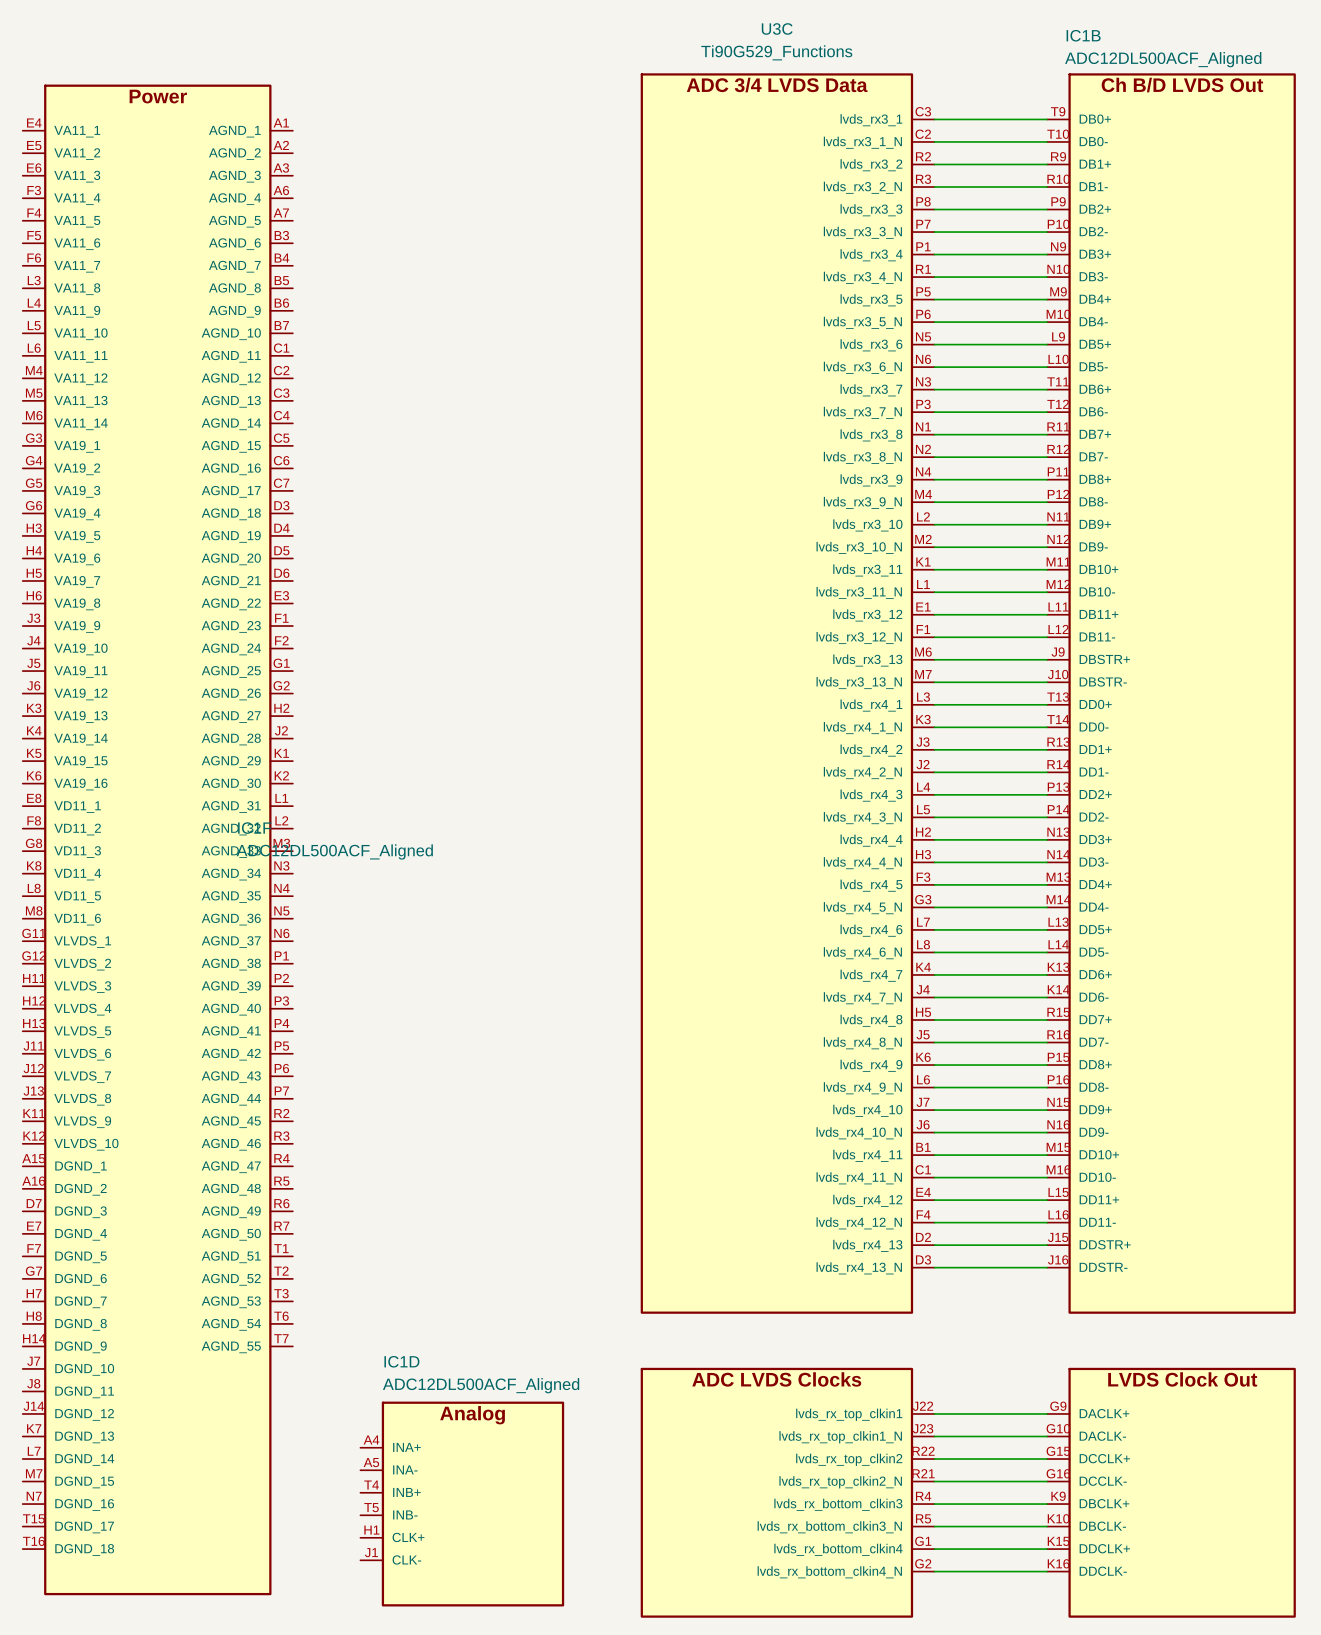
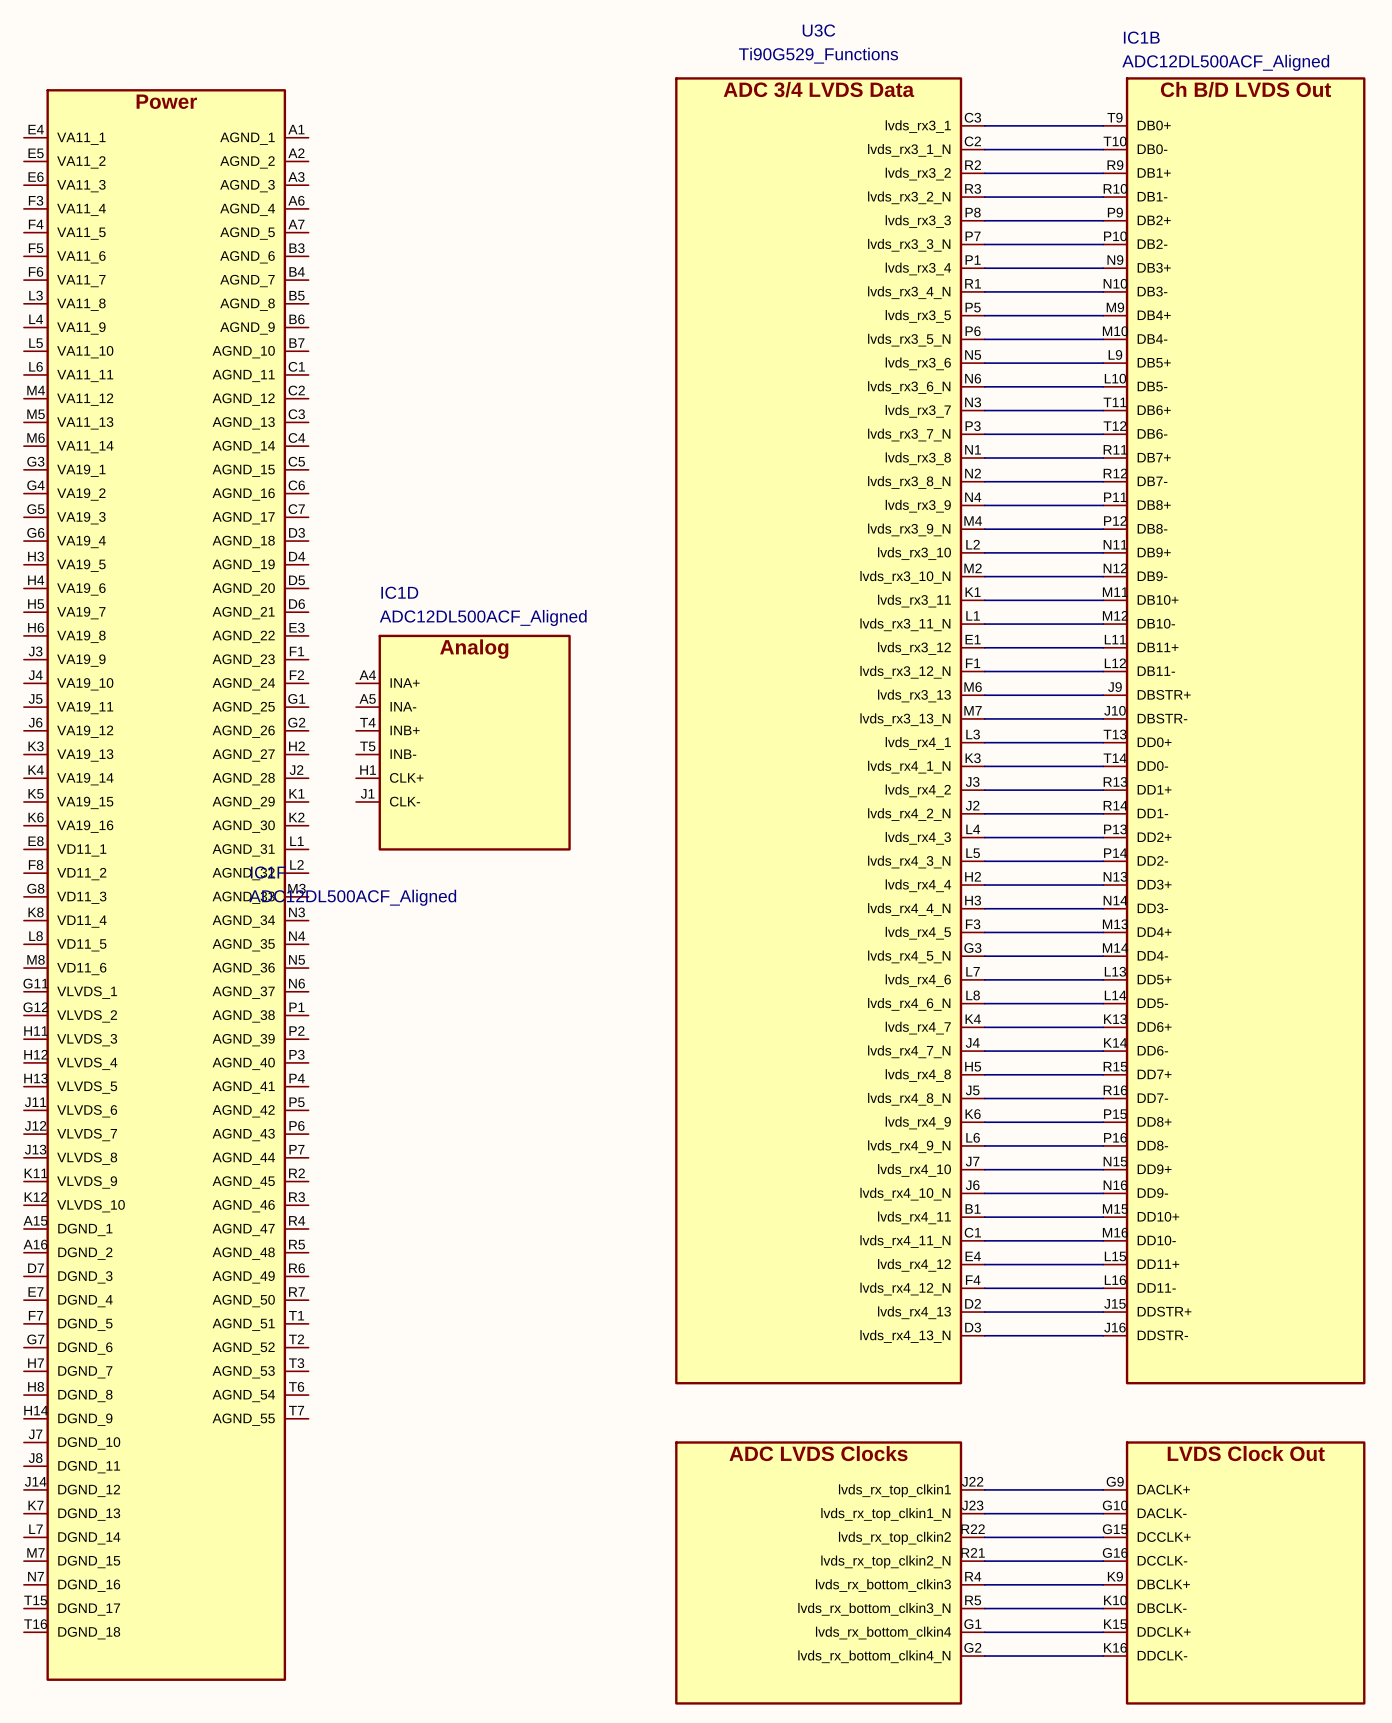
IC1D position: (462, 1504) -> (463, 742)

